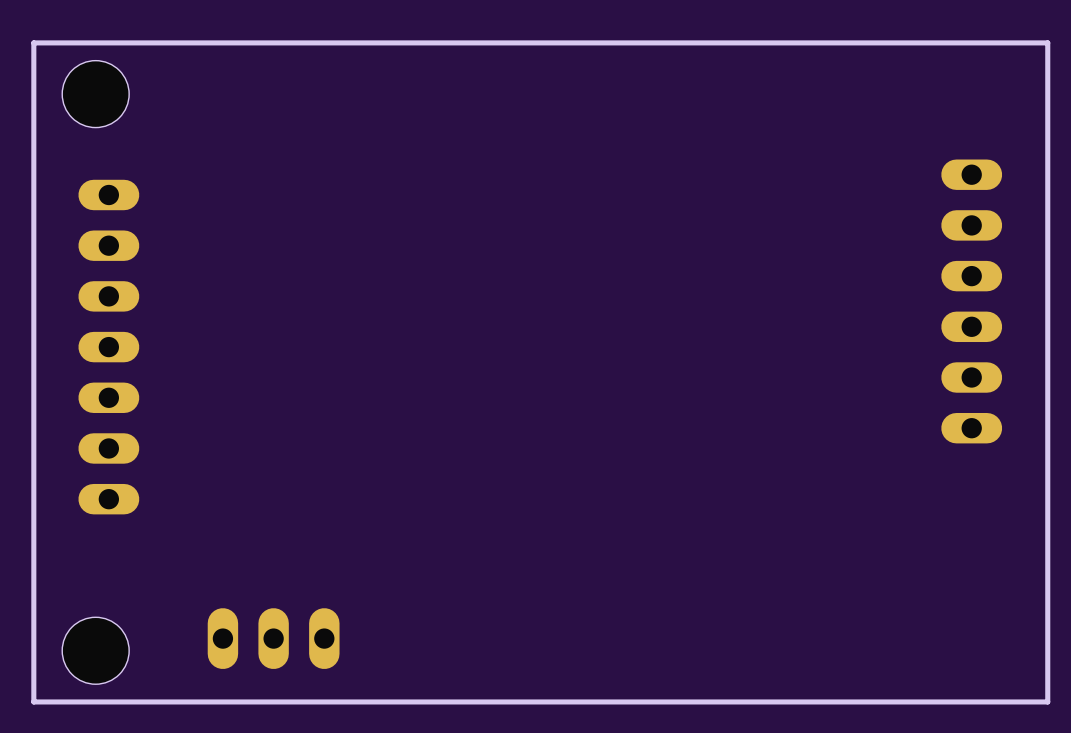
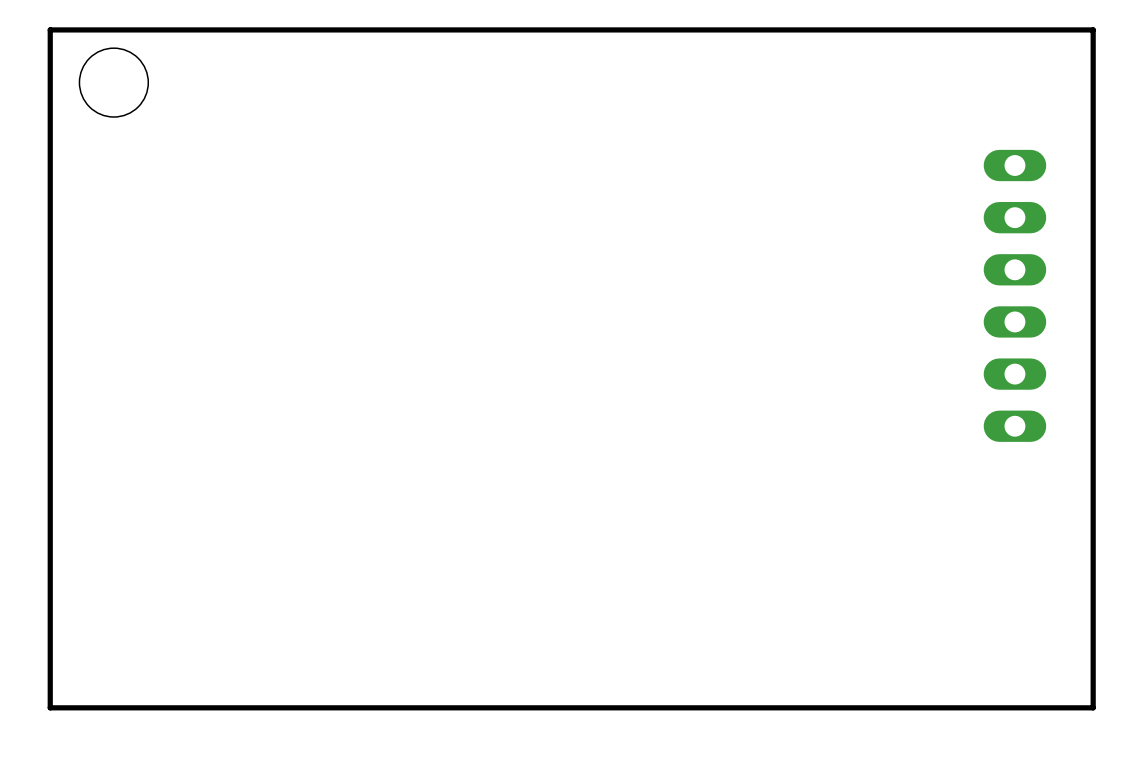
part: (108, 347) -> none
part: (273, 638) -> none
hole: (95, 650) -> none

